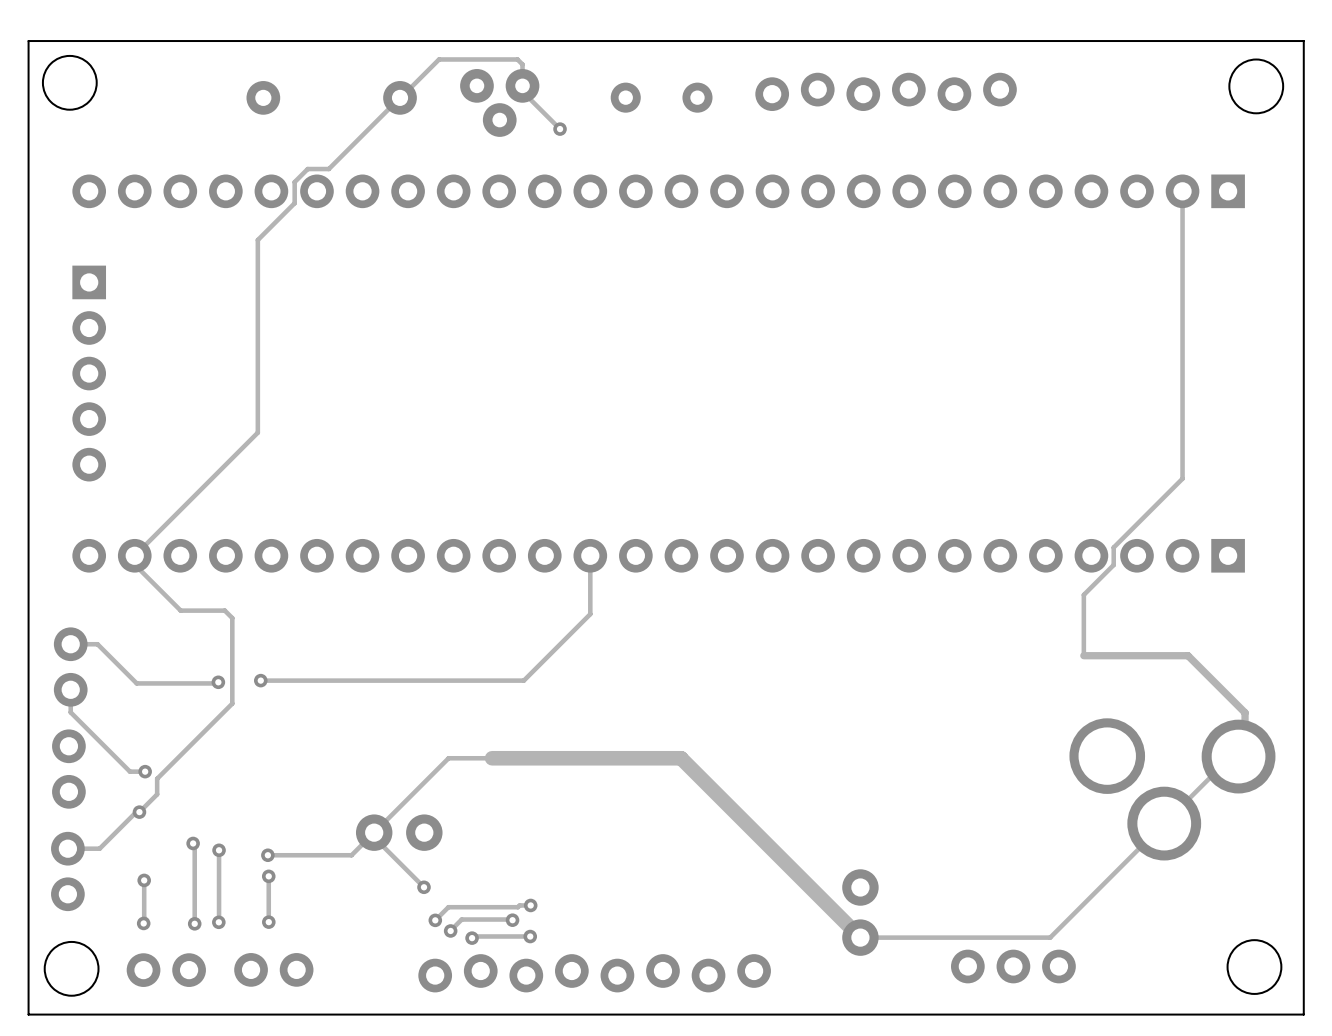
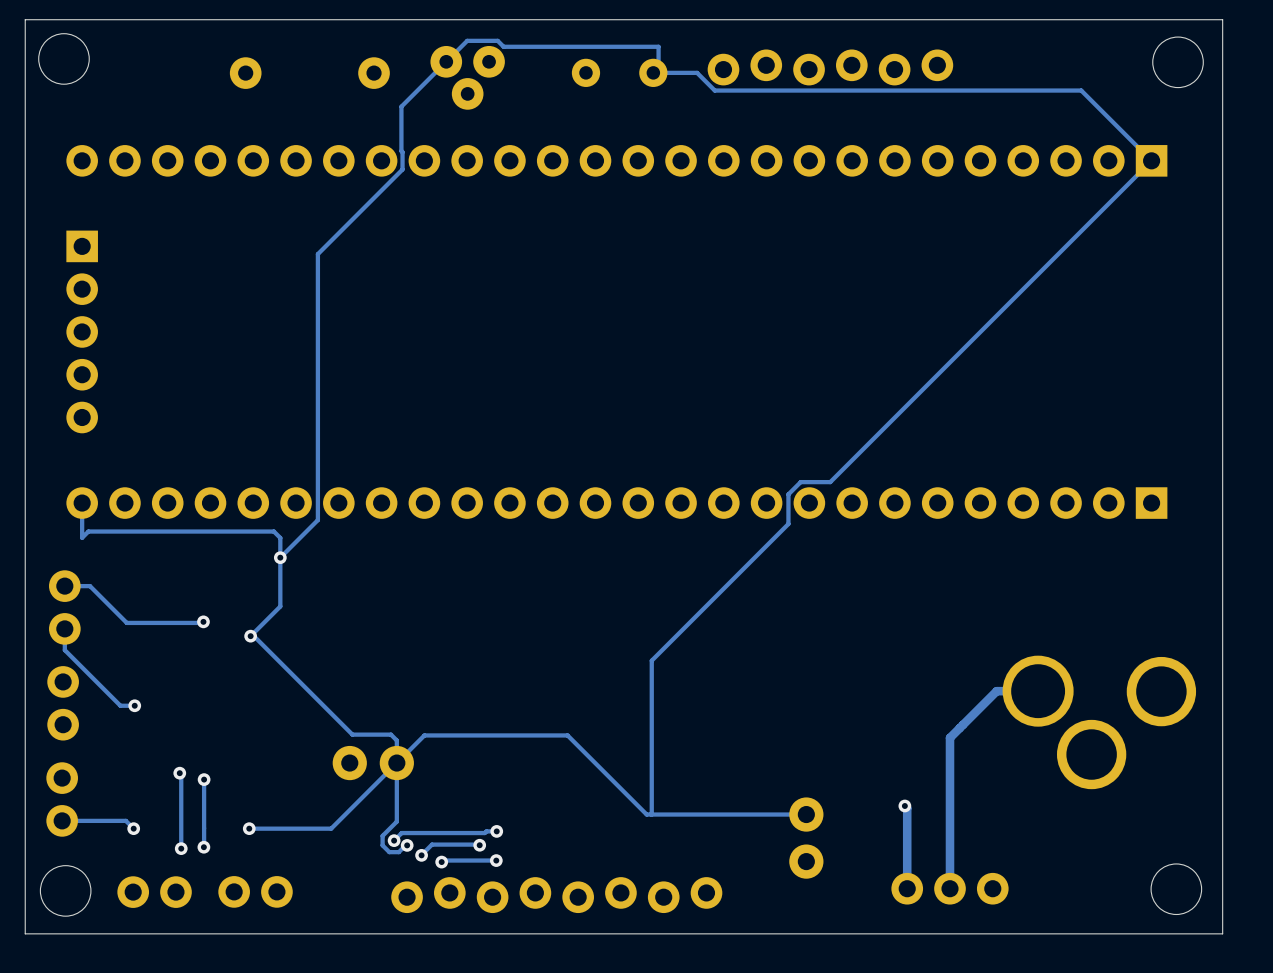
track: (560, 129) (522, 91) (522, 64) (517, 59) (439, 59) (328, 169) (307, 169) (294, 182) (294, 203) (257, 240) (257, 432) (134, 555) (134, 564) (180, 610) (224, 610) (232, 618) (232, 703) (157, 778) (157, 794) (99, 848) (67, 848) -> none
via: (560, 129) -> none
track: (1182, 191) (1182, 478) (1113, 547) (1113, 565) (1083, 594) (1083, 655) (1188, 655) (1245, 712) (1245, 745) (1234, 756) (1231, 756) -> none
track: none -> (82, 503) (82, 537) (88, 531) (273, 531) (280, 537) (280, 606) (250, 636) (253, 636) (352, 734) (390, 734) (396, 740) (396, 821) (382, 835) (382, 845) (389, 852) (398, 852) (406, 844) (410, 844)
track: (590, 555) (590, 614) (523, 680) (260, 680) -> none
track: none -> (280, 557) (317, 520) (317, 254) (402, 169) (401, 106) (467, 40) (497, 40) (503, 46) (658, 46) (658, 67) (653, 72) (697, 72) (714, 90) (1081, 90) (1151, 160) (830, 482) (800, 482) (788, 494) (788, 523) (651, 660) (651, 814)
via: none -> (280, 557)
via position: (260, 680) -> (250, 636)
track: none -> (1038, 691) (996, 691) (950, 737) (950, 888)
track: (1231, 756) (1050, 937) (860, 937) (681, 758) (448, 758) (351, 855) (267, 855) -> none
via: (139, 812) -> none
track: (374, 832) (374, 837) (424, 887) -> none
via: (267, 855) -> none
track: (268, 876) (268, 922) -> none
via: (268, 876) -> none
track: none -> (904, 805) (907, 808) (907, 888)
via: none -> (904, 805)
track: (144, 880) (144, 917) (146, 920) (143, 923) -> none
via: (144, 880) -> none
via position: (424, 887) -> (394, 840)
track: none -> (806, 814) (646, 814) (567, 735) (424, 735) (331, 828) (249, 828)
track: none -> (62, 820) (125, 820) (133, 828)
via: none -> (133, 828)
via: none -> (249, 828)
track: (448, 907) (435, 920) -> (419, 833) (401, 833) (394, 840)
via: (268, 922) -> none
via: (143, 923) -> none

